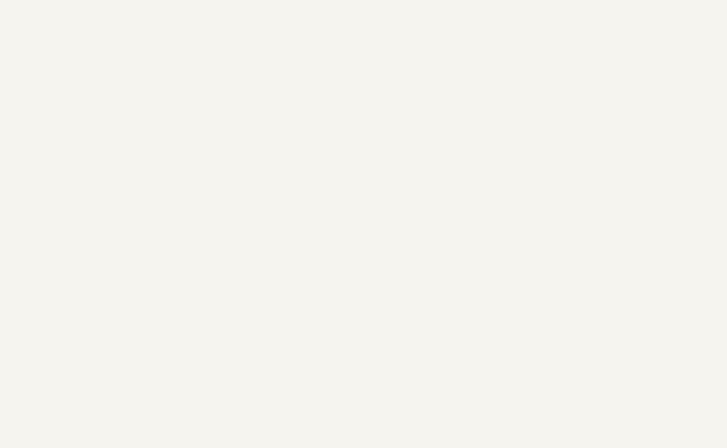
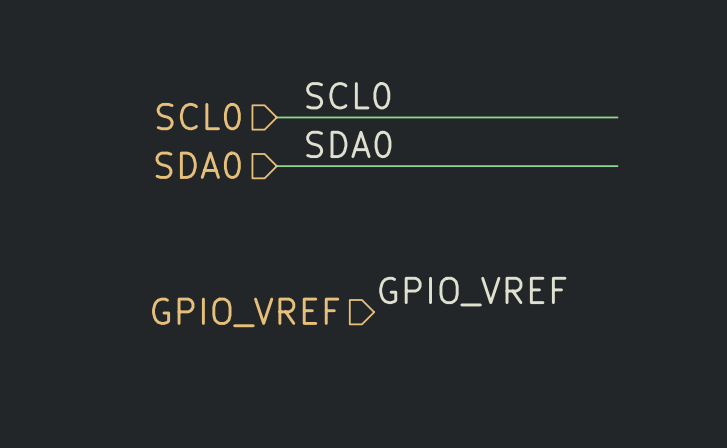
label: none -> SCL0 (348, 95)
hierarchical label: none -> SCL0 (198, 116)
wire: none -> (276, 117) (617, 117)
label: none -> SDA0 (348, 144)
hierarchical label: none -> SDA0 (198, 165)
wire: none -> (276, 166) (617, 166)
label: none -> GPIO_VREF (472, 291)
hierarchical label: none -> GPIO_VREF (245, 312)

